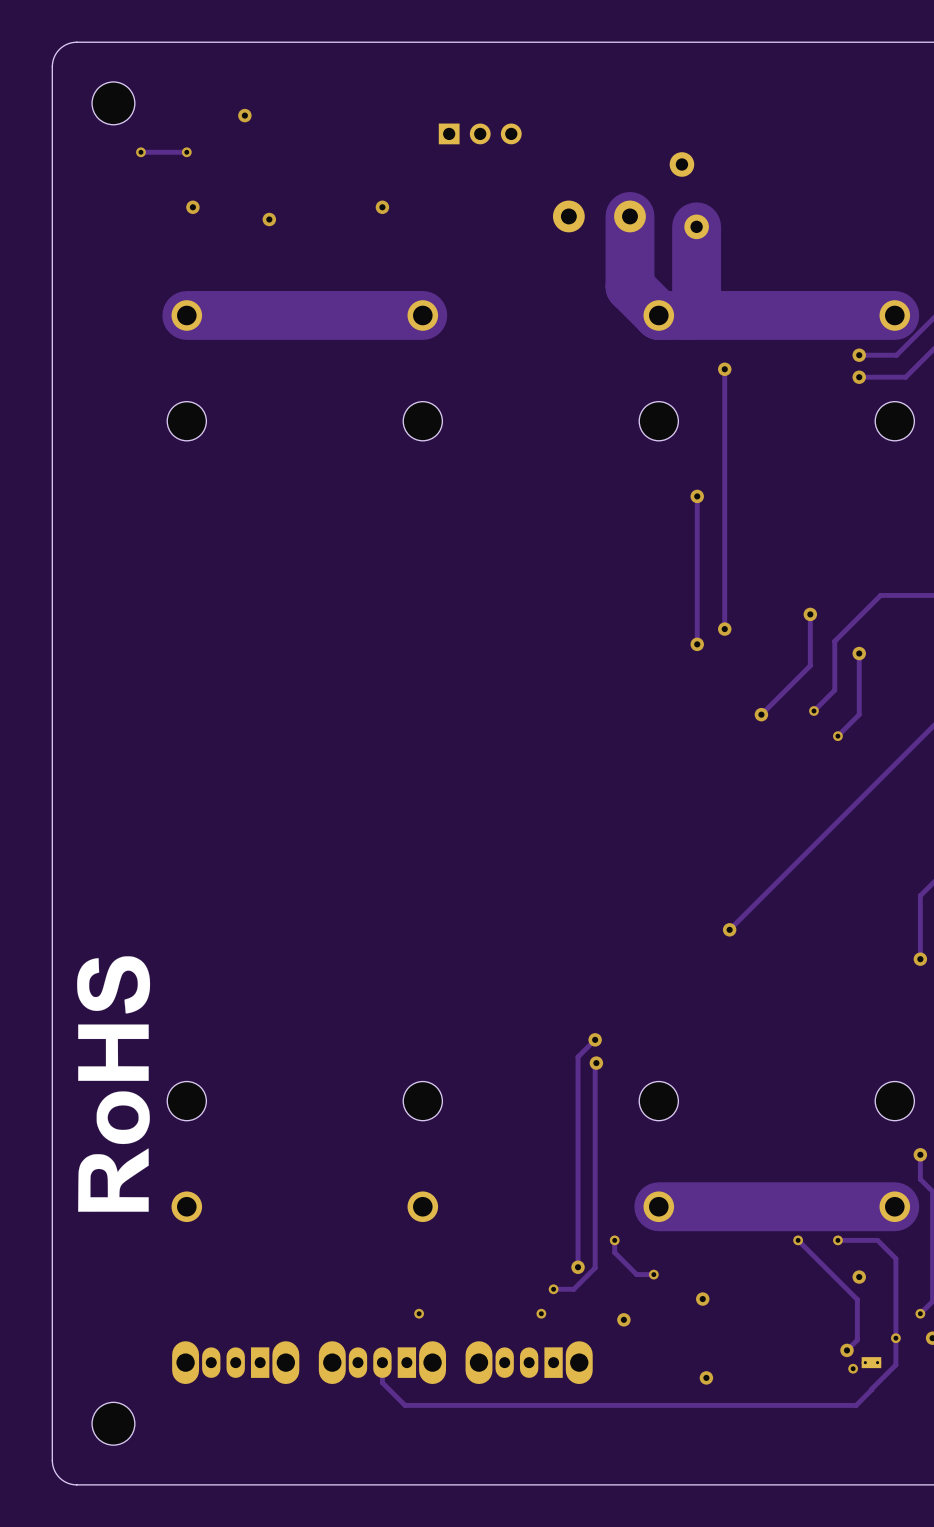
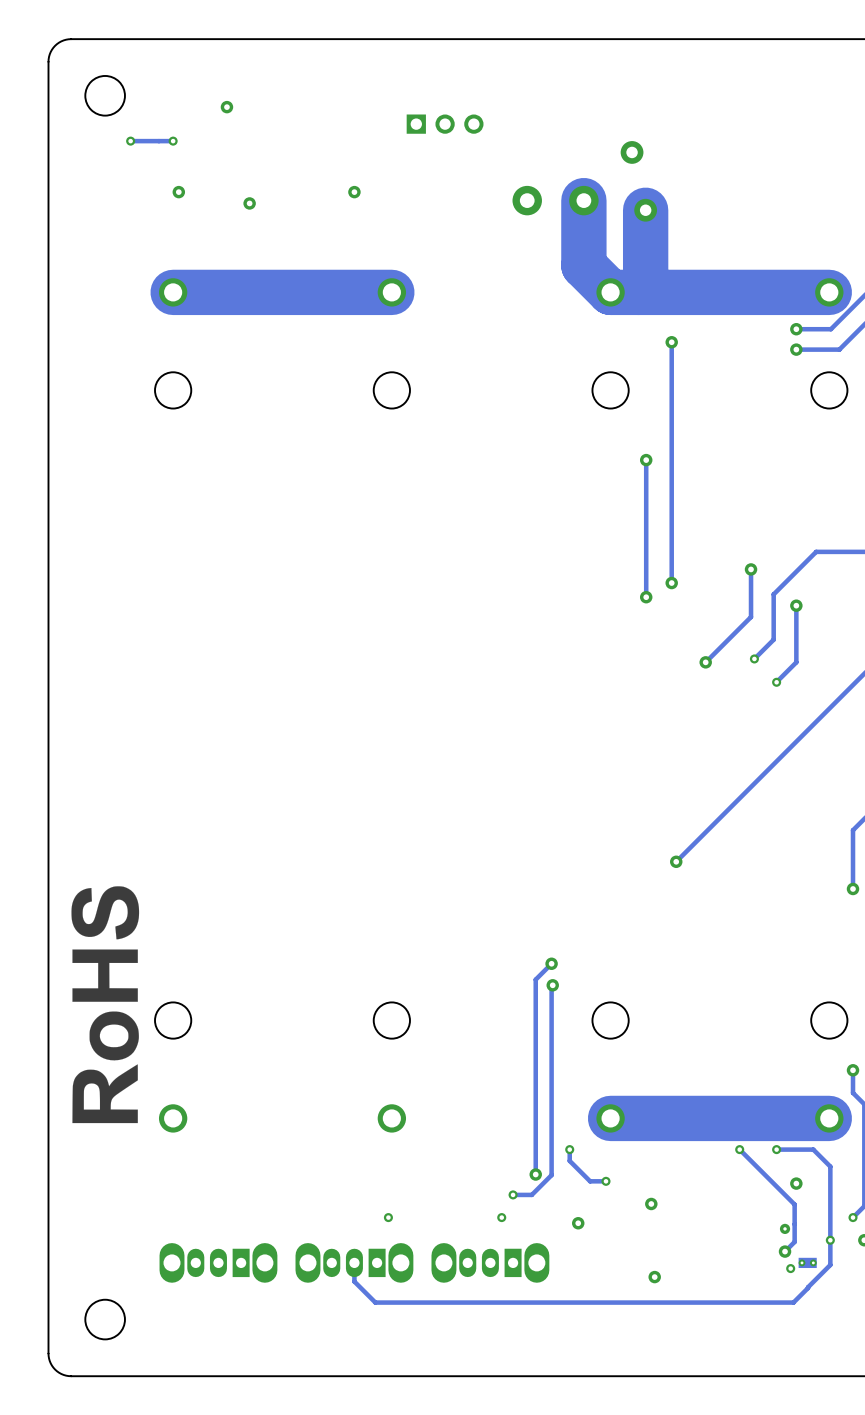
via: none -> (785, 1228)

